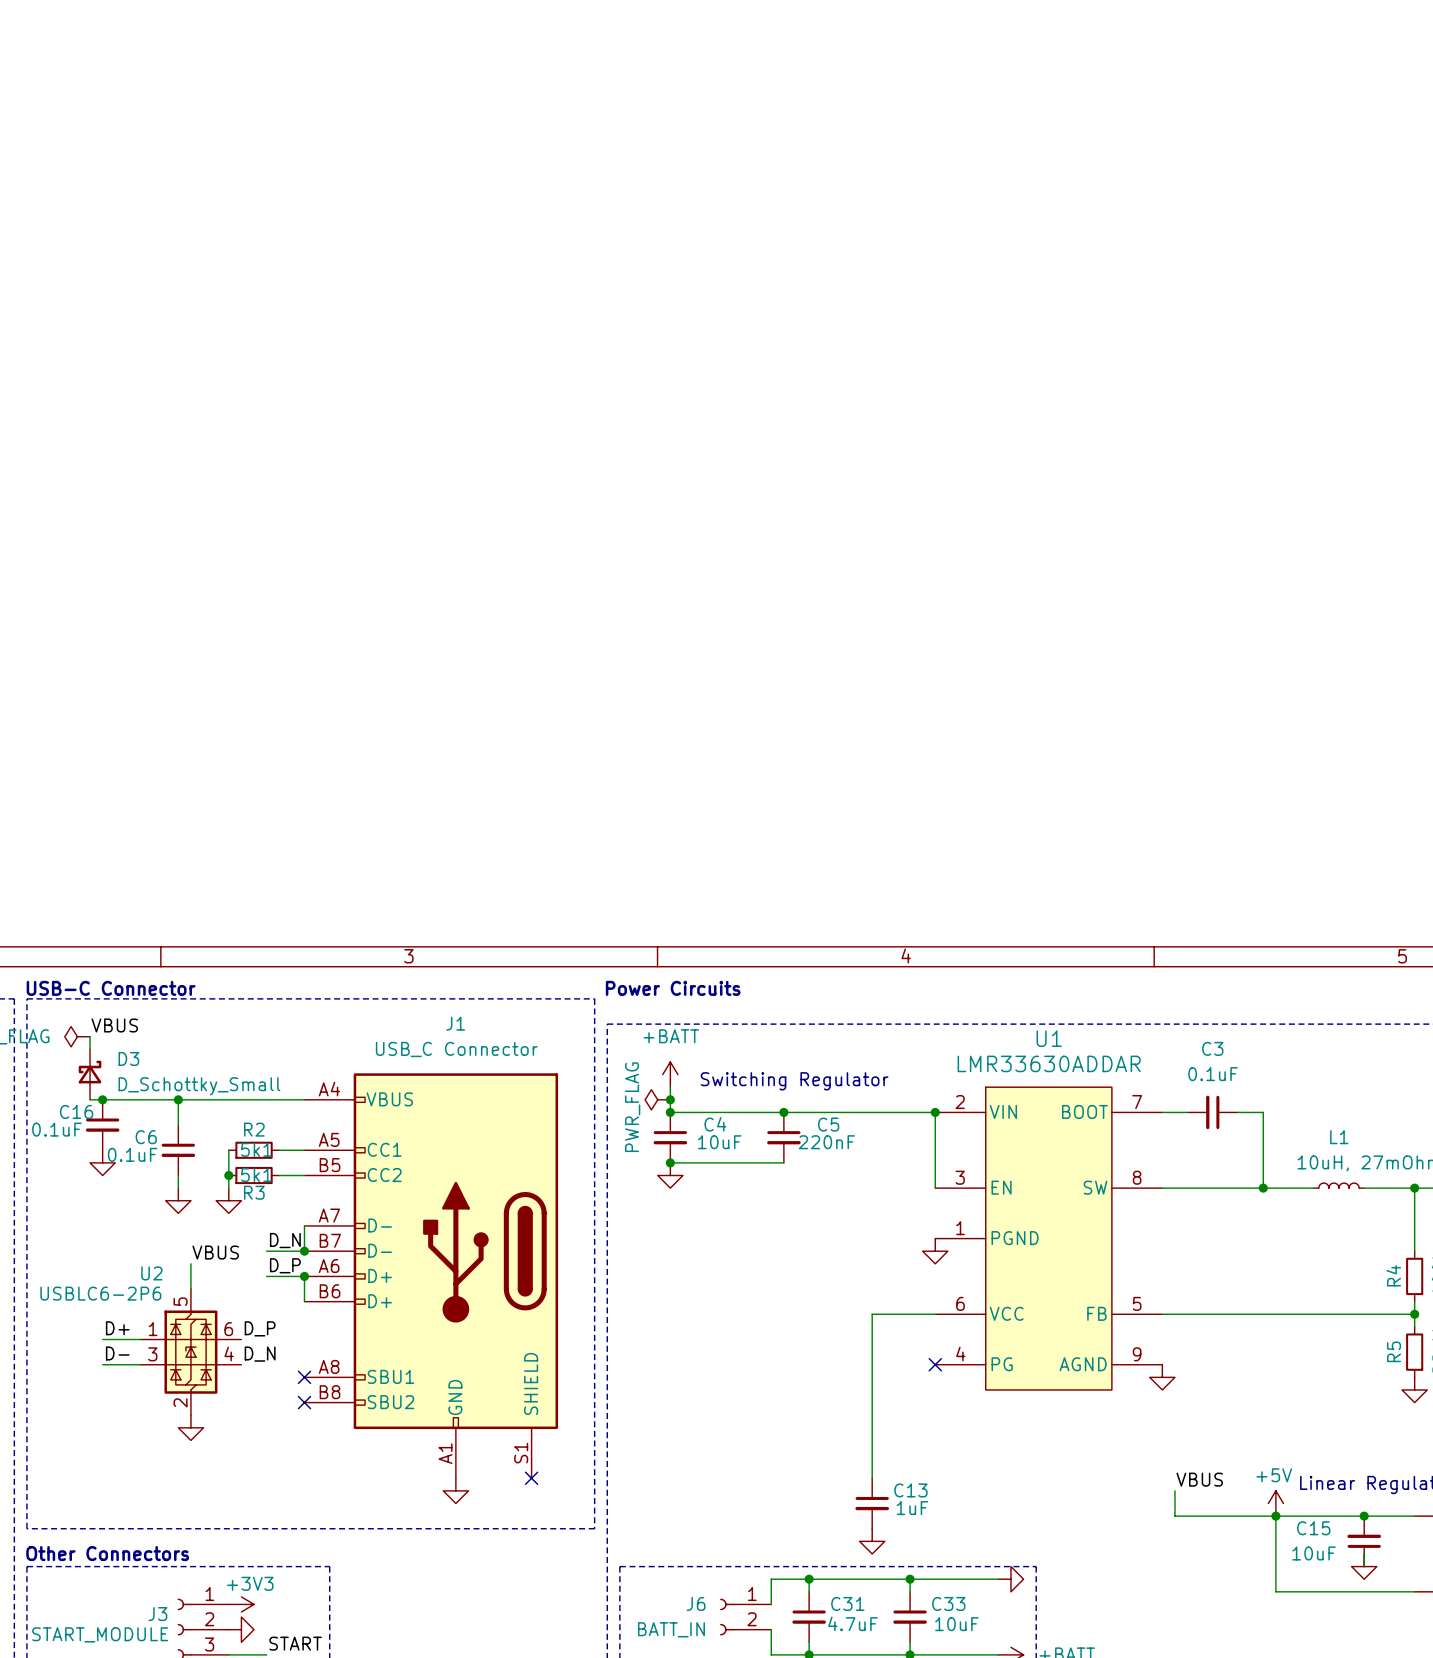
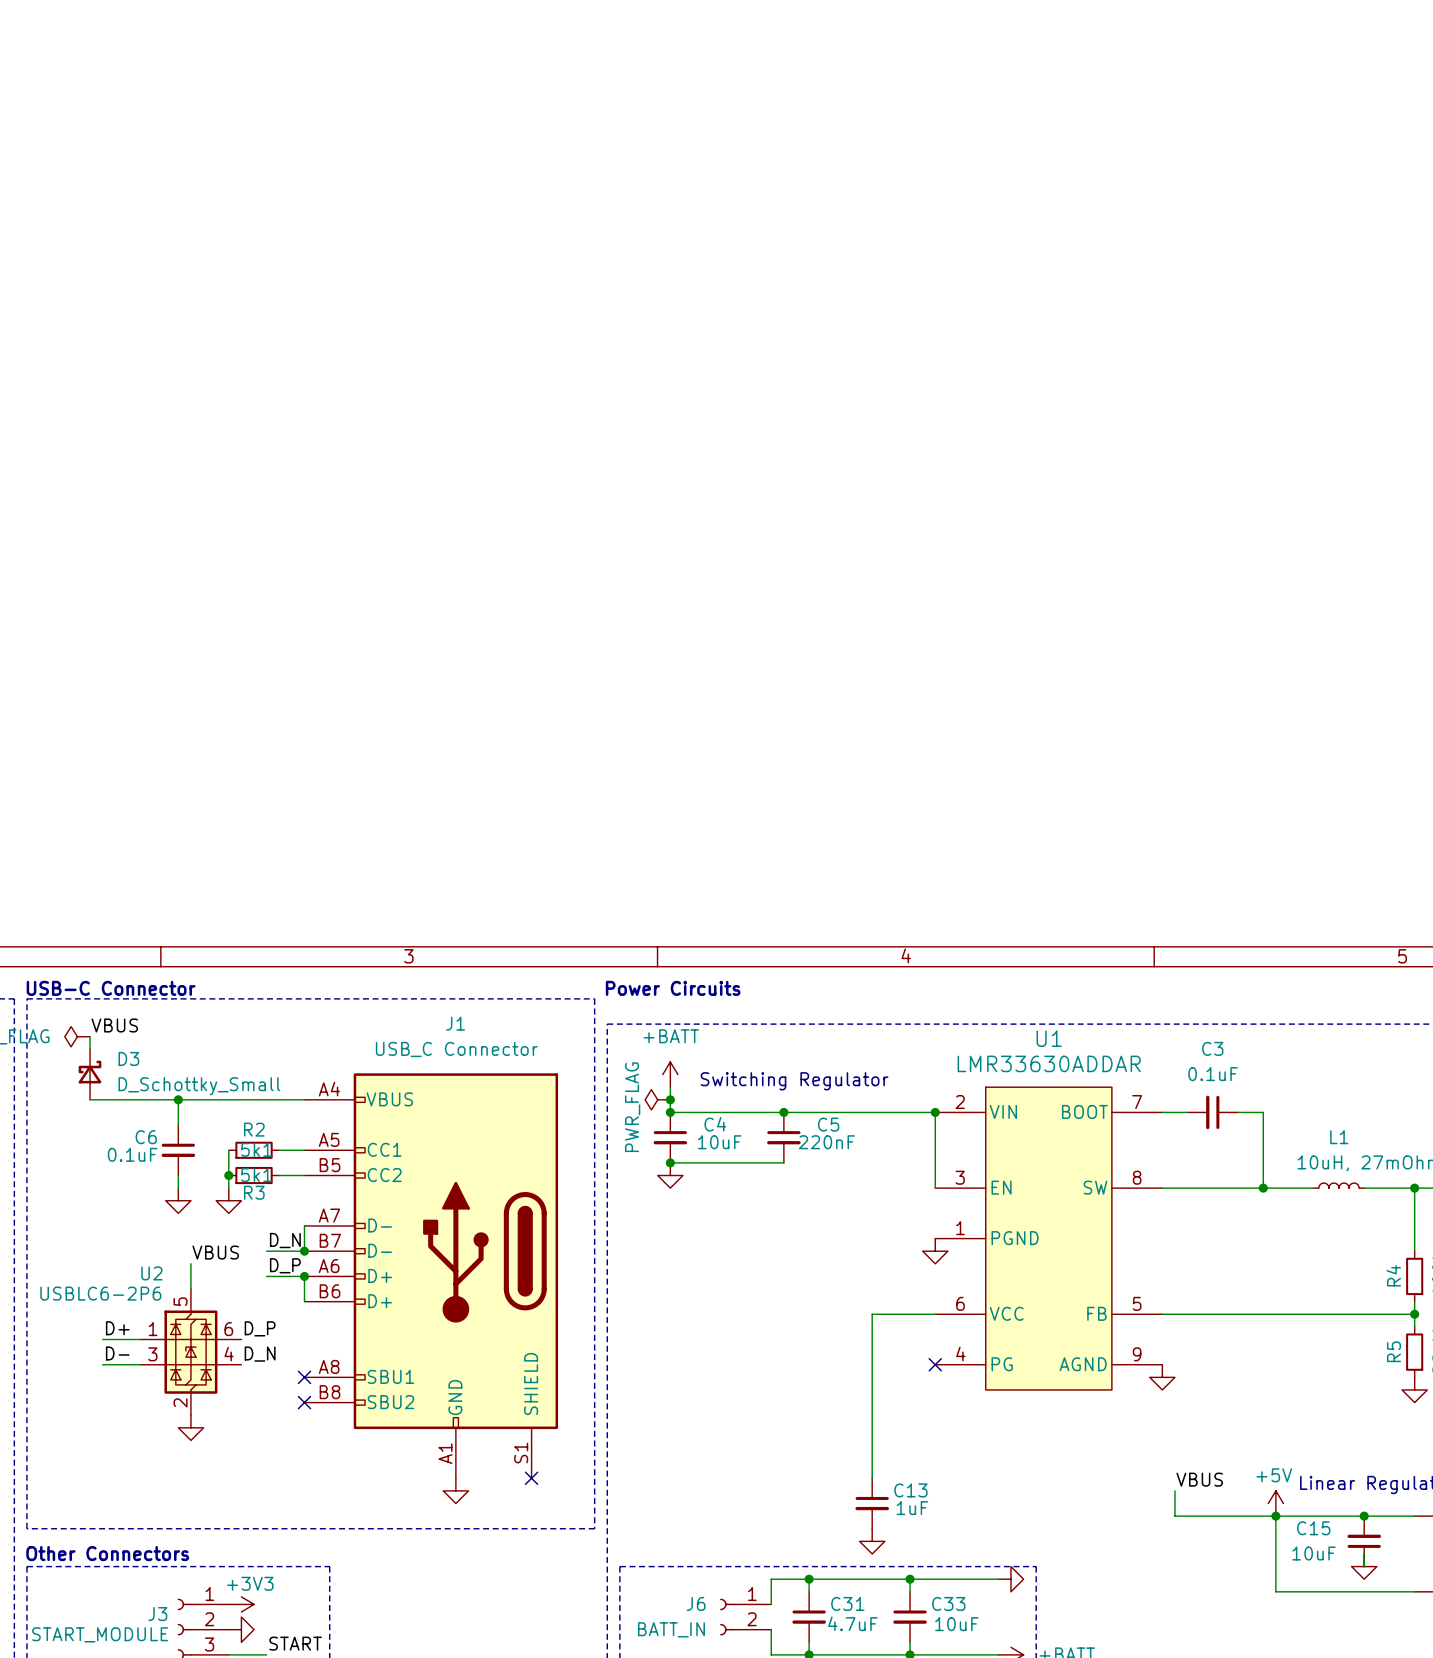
junction: (102, 1099) -> none
C16: 0.1uF (102, 1125) -> none
power symbol: (102, 1162) -> none

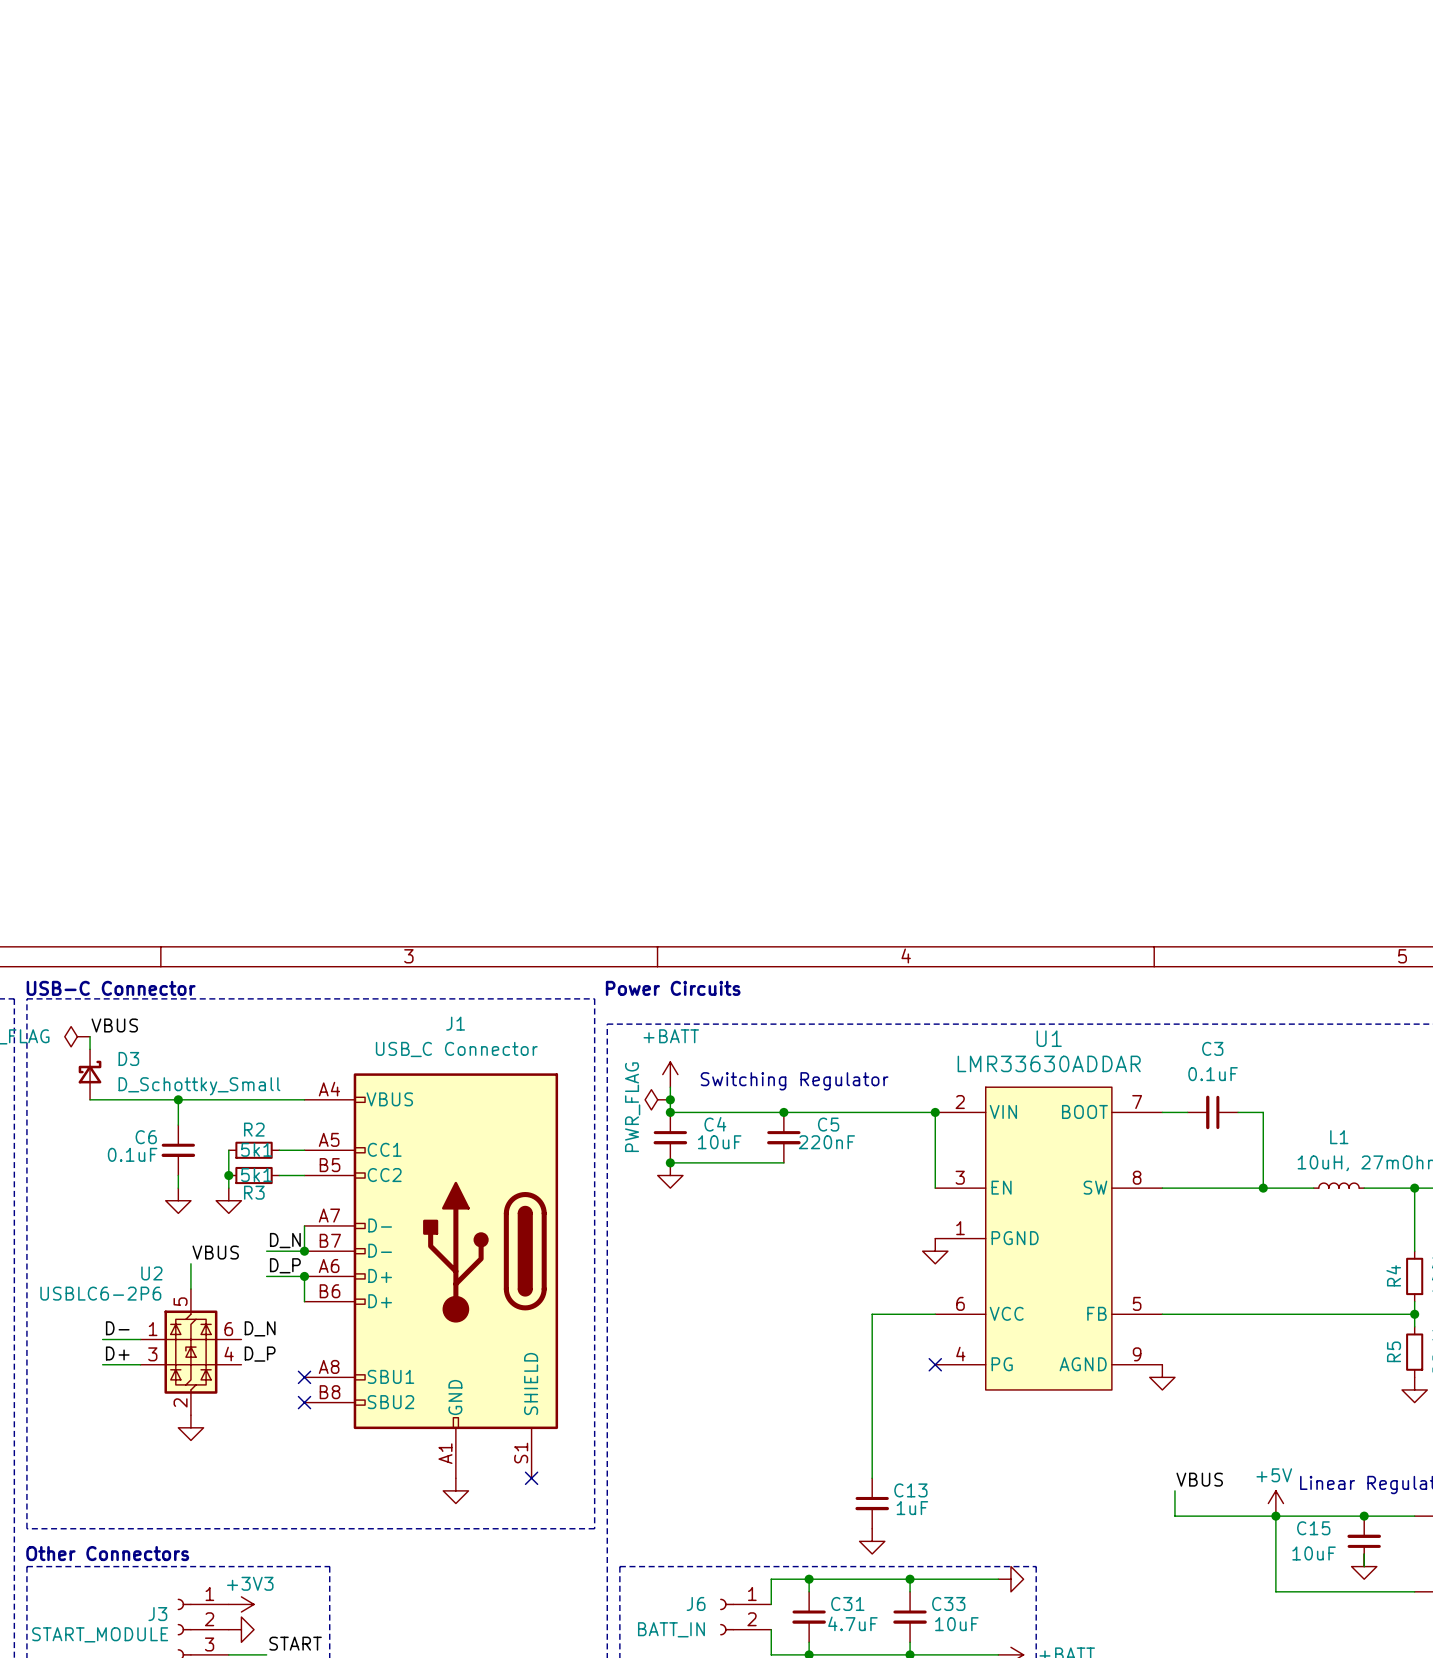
label: D+ (117, 1328) -> D- (117, 1328)
label: D_P (260, 1328) -> D_N (260, 1328)
label: D- (117, 1353) -> D+ (117, 1353)
label: D_N (260, 1354) -> D_P (260, 1354)

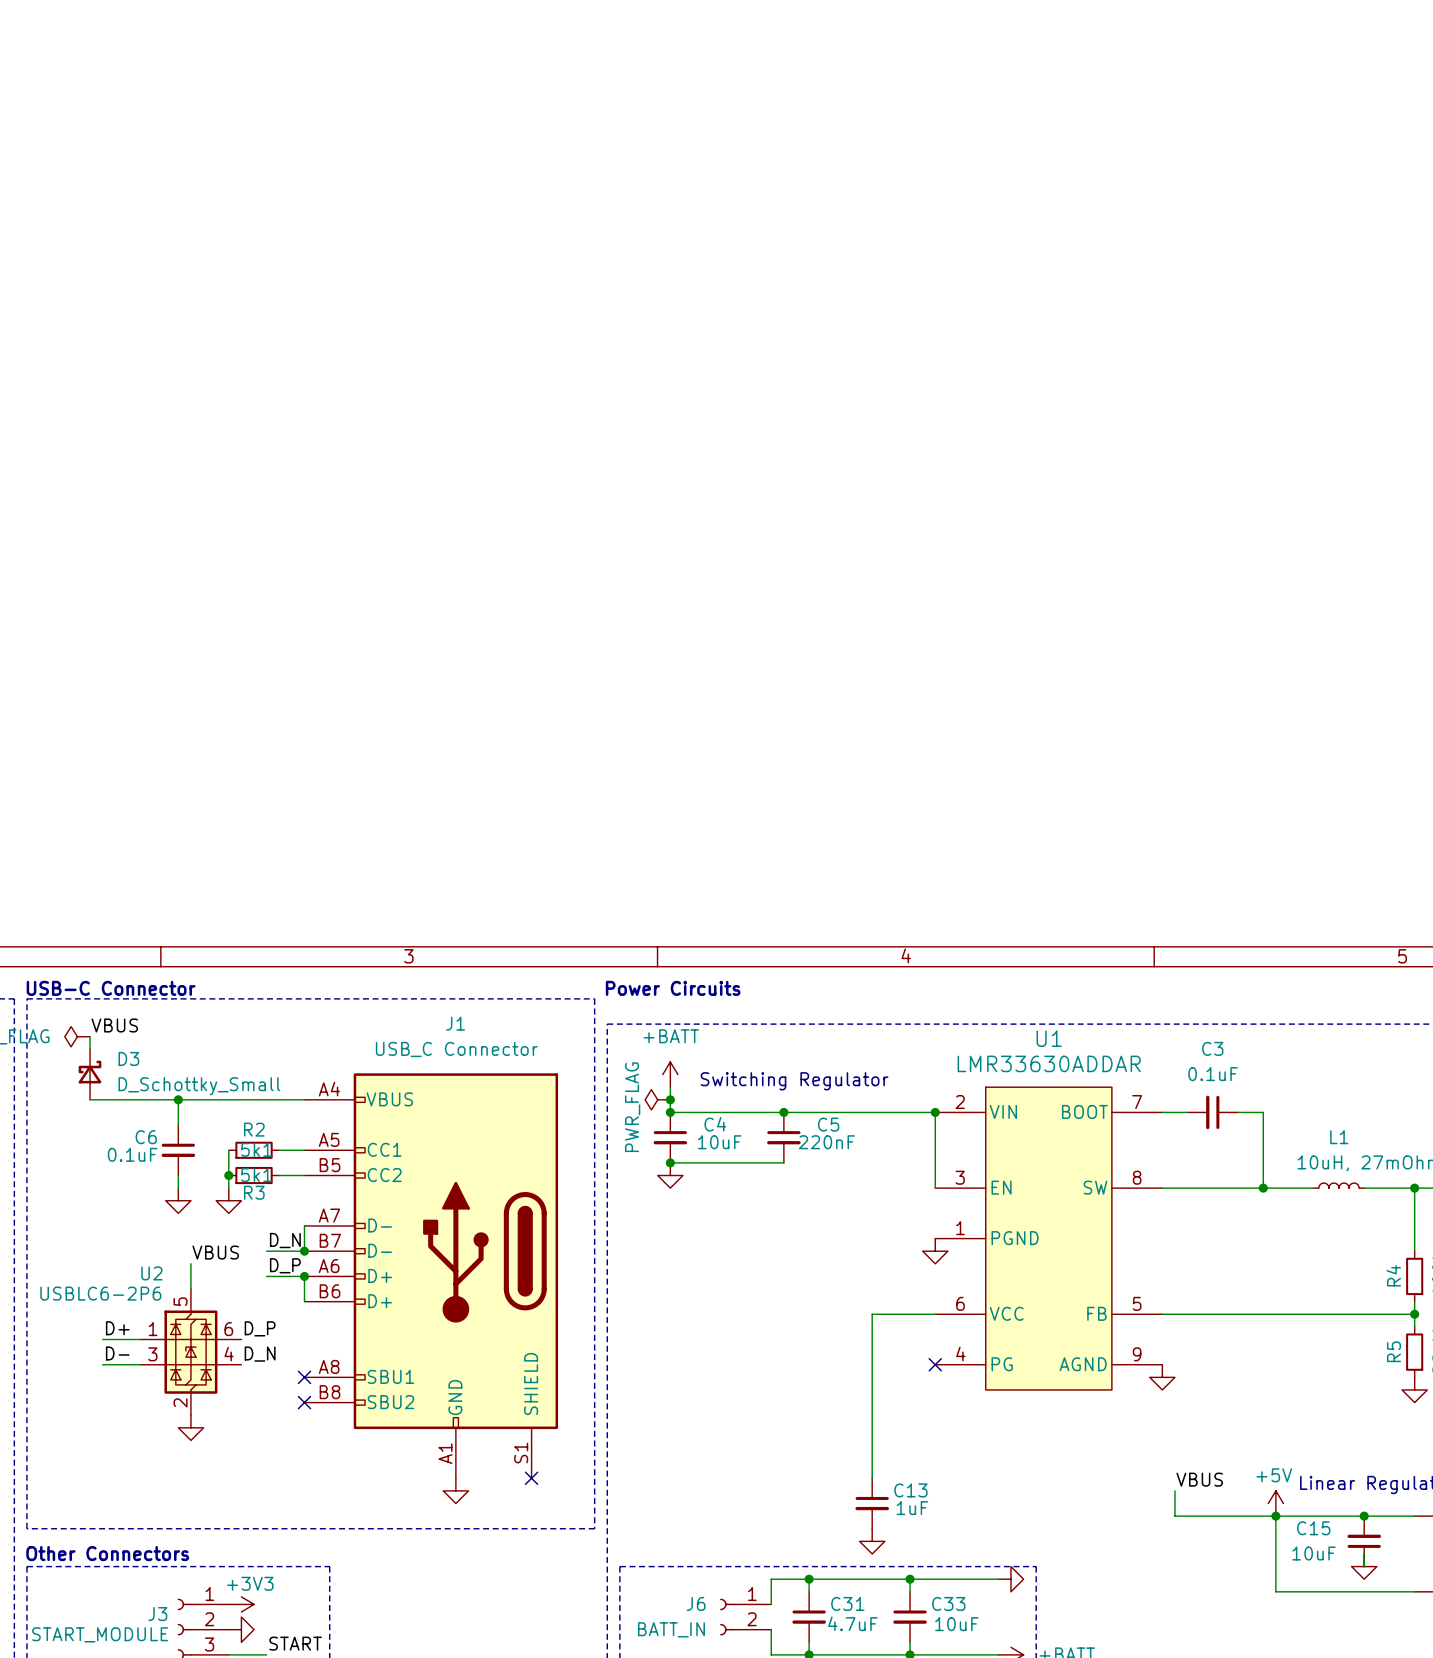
label: D- (117, 1328) -> D+ (117, 1328)
label: D_N (260, 1328) -> D_P (260, 1328)
label: D+ (117, 1353) -> D- (117, 1353)
label: D_P (260, 1354) -> D_N (260, 1354)

